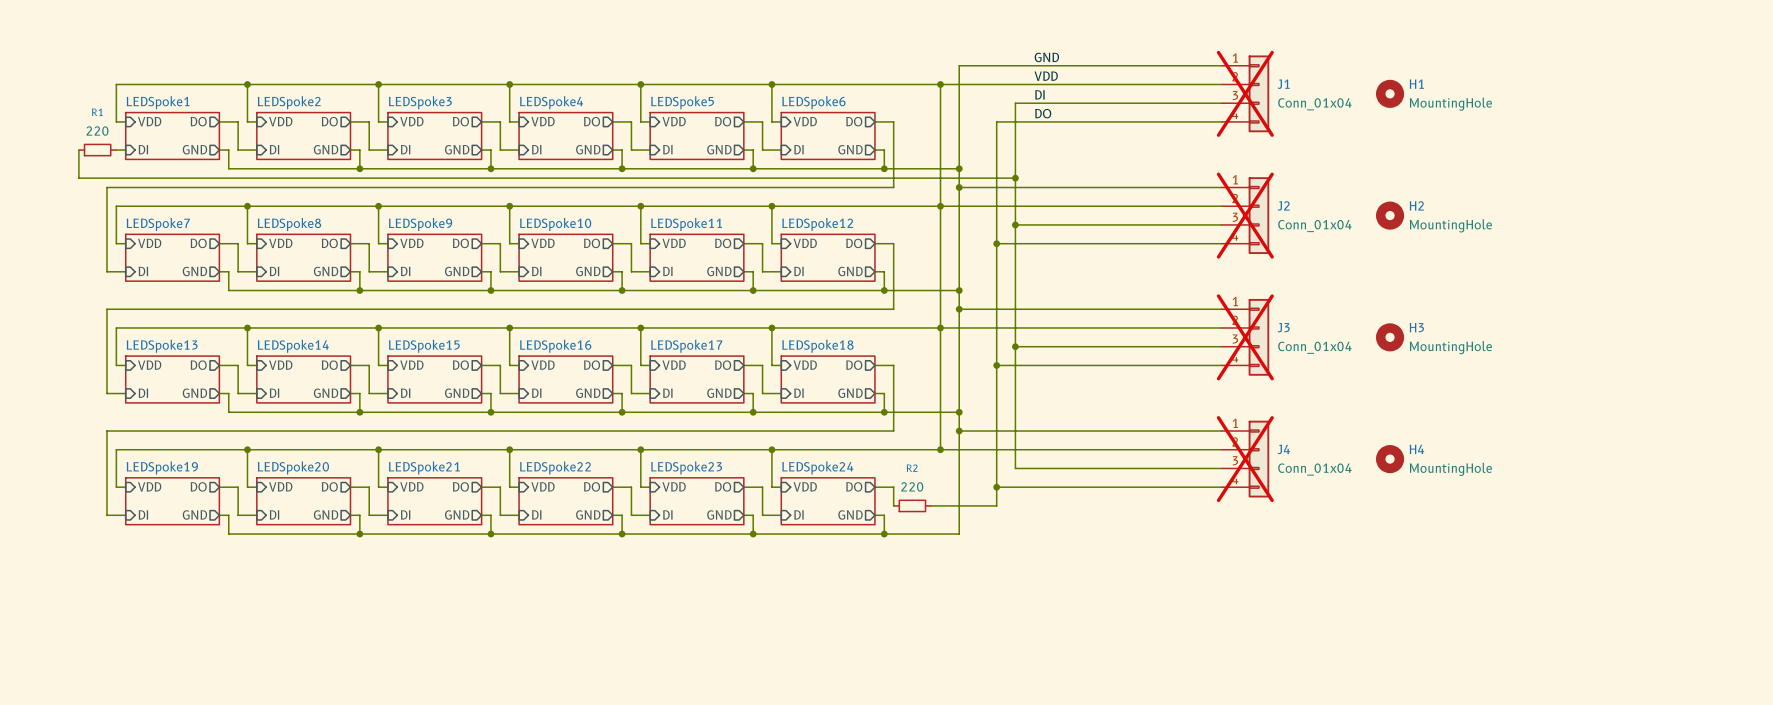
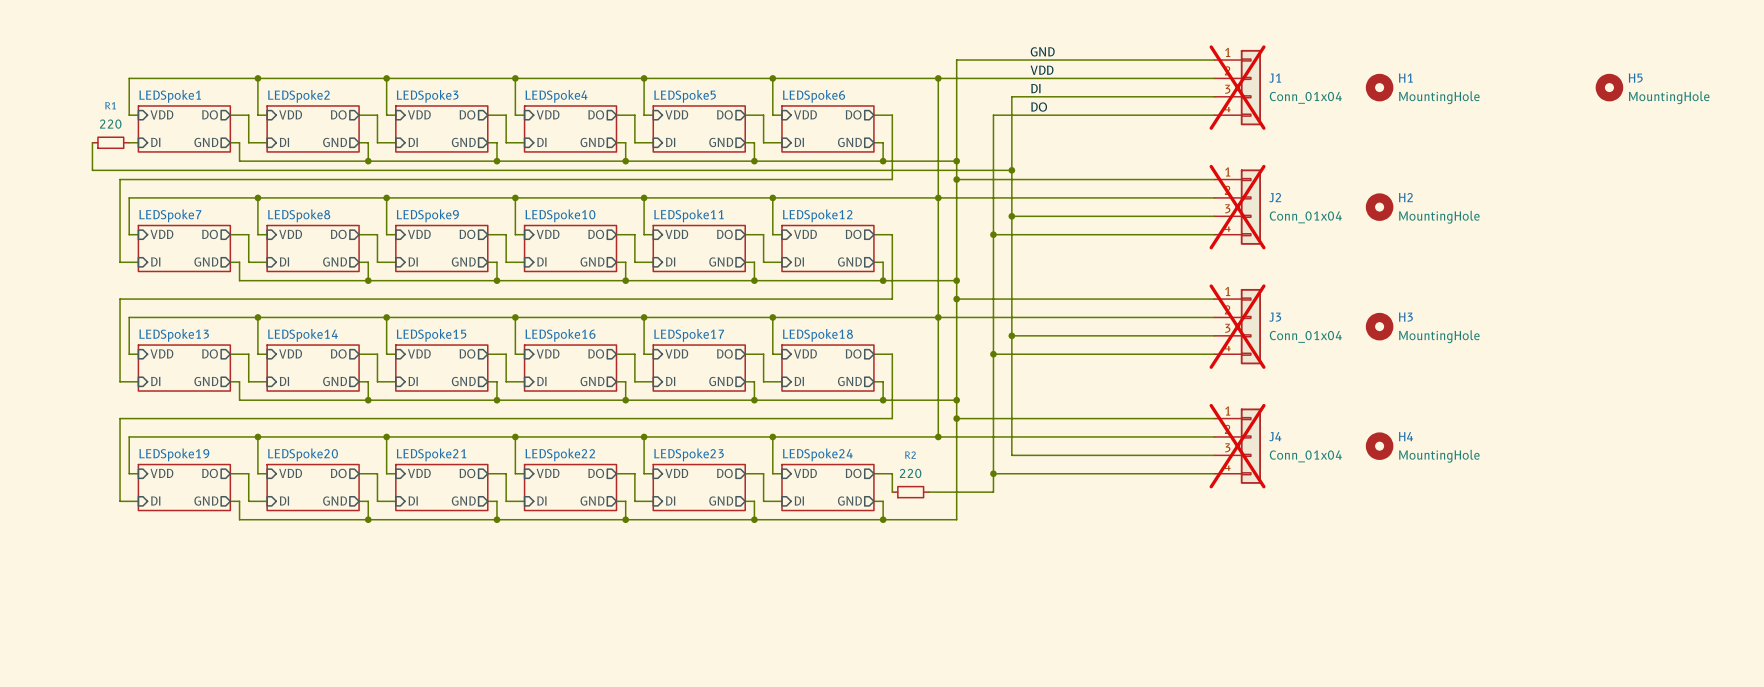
H5: none -> MountingHole (1609, 87)

